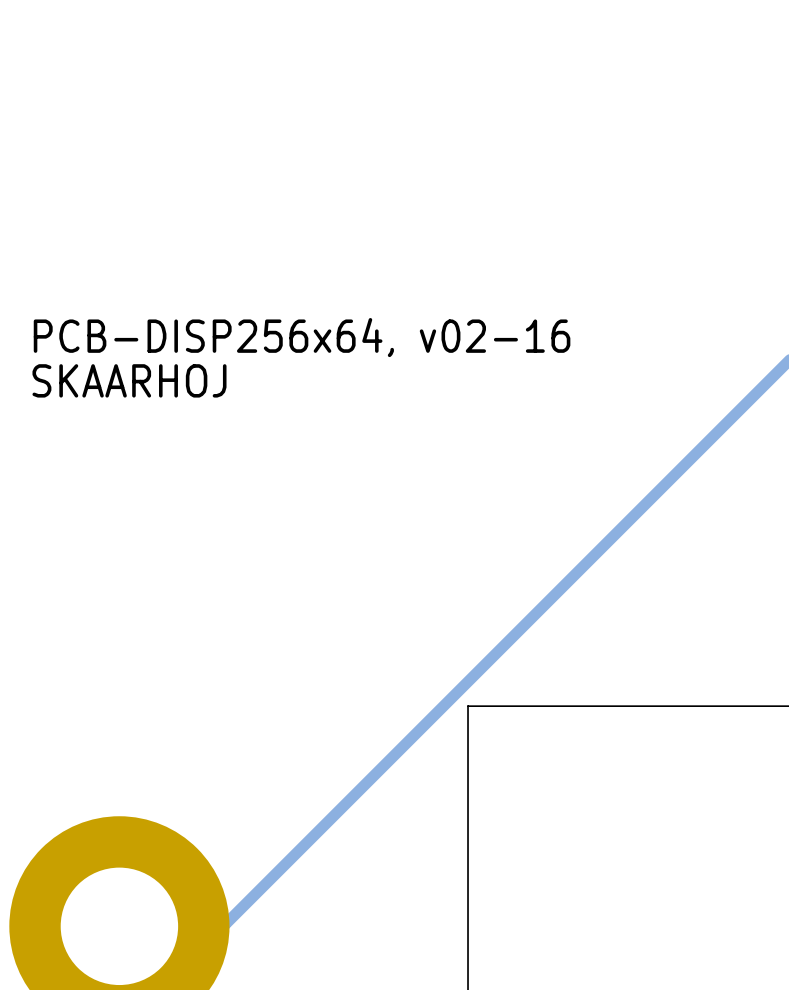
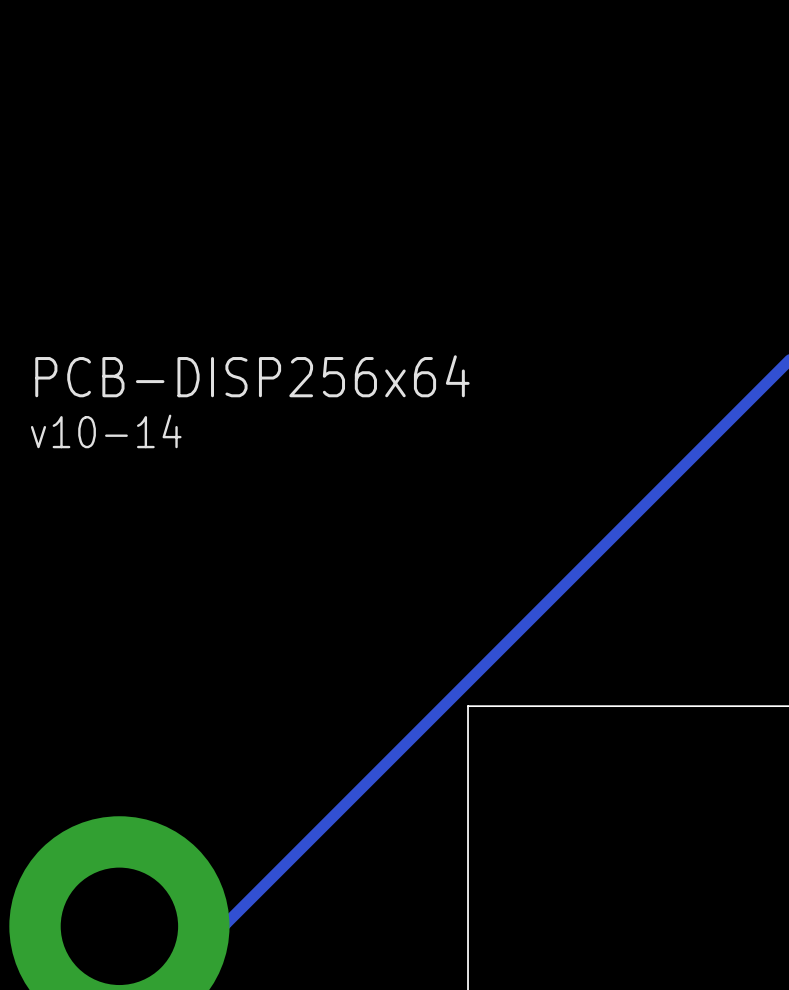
text: PCB-DISP256x64, v02-16 (302, 337) -> none
text: SKAARHOJ (129, 380) -> PCB-DISP256x64 (252, 376)
text: none -> v10-14 (106, 431)

